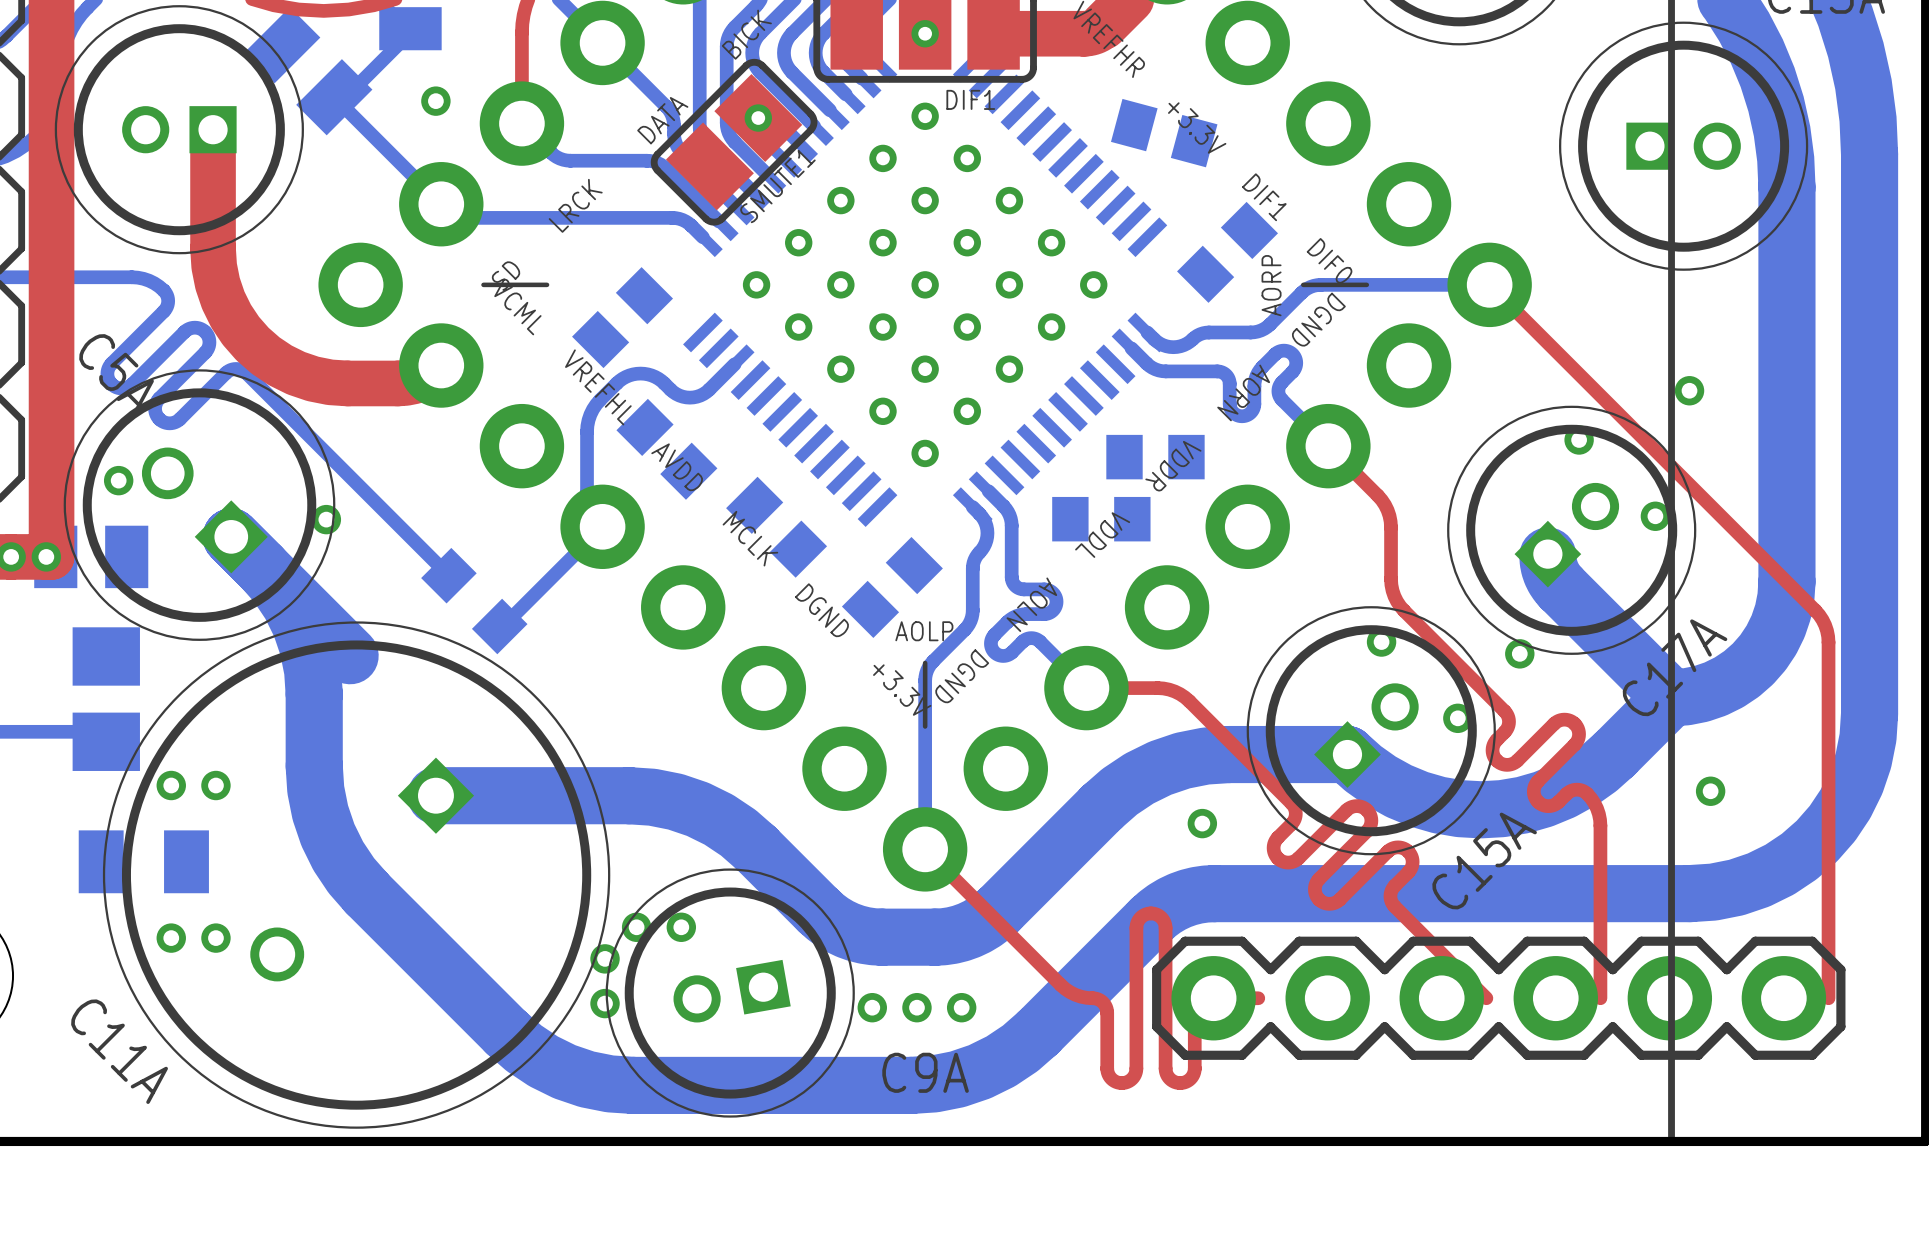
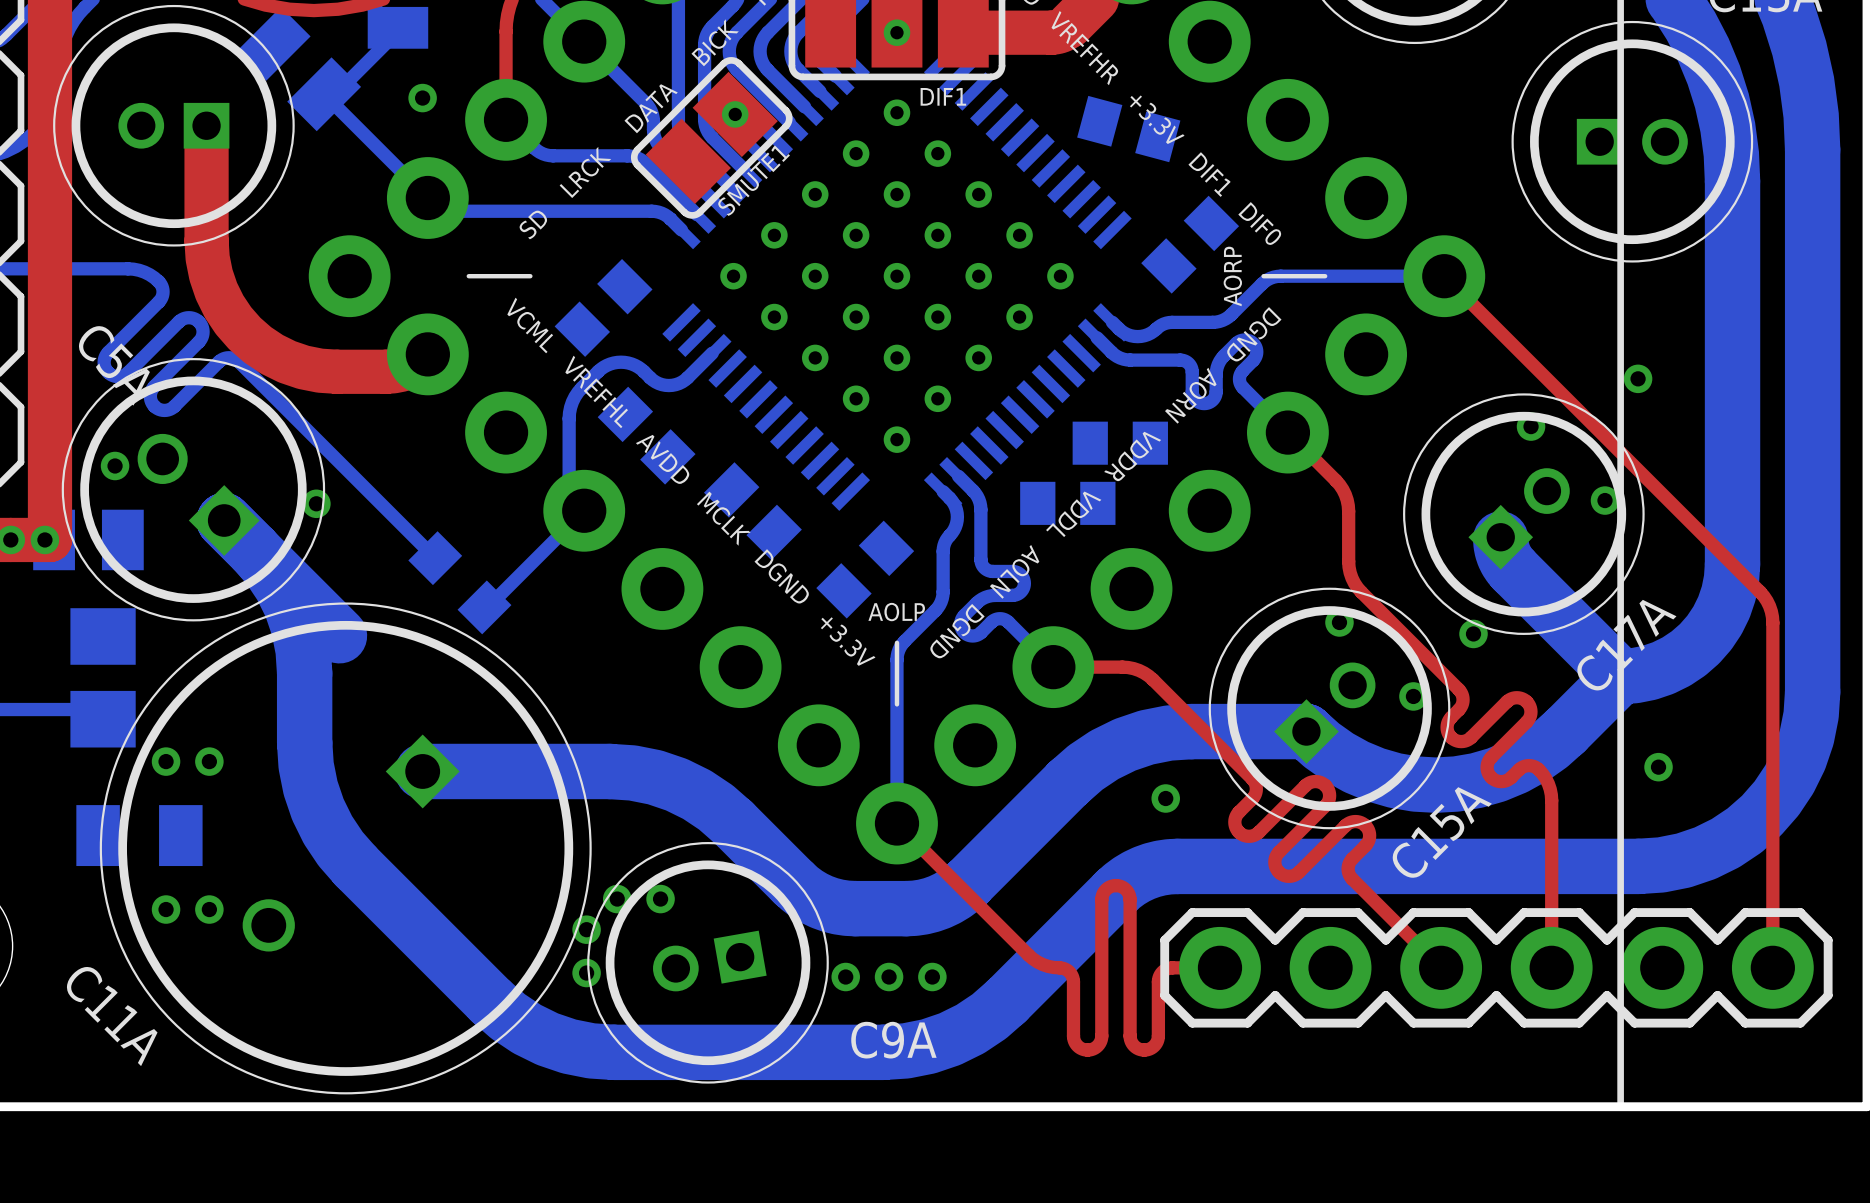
part position: (1498, 998) -> (1496, 967)

